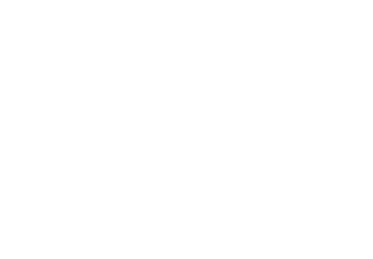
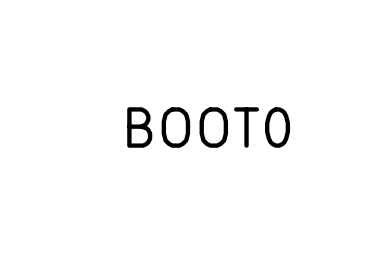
label: none -> BOOT0 (208, 127)

